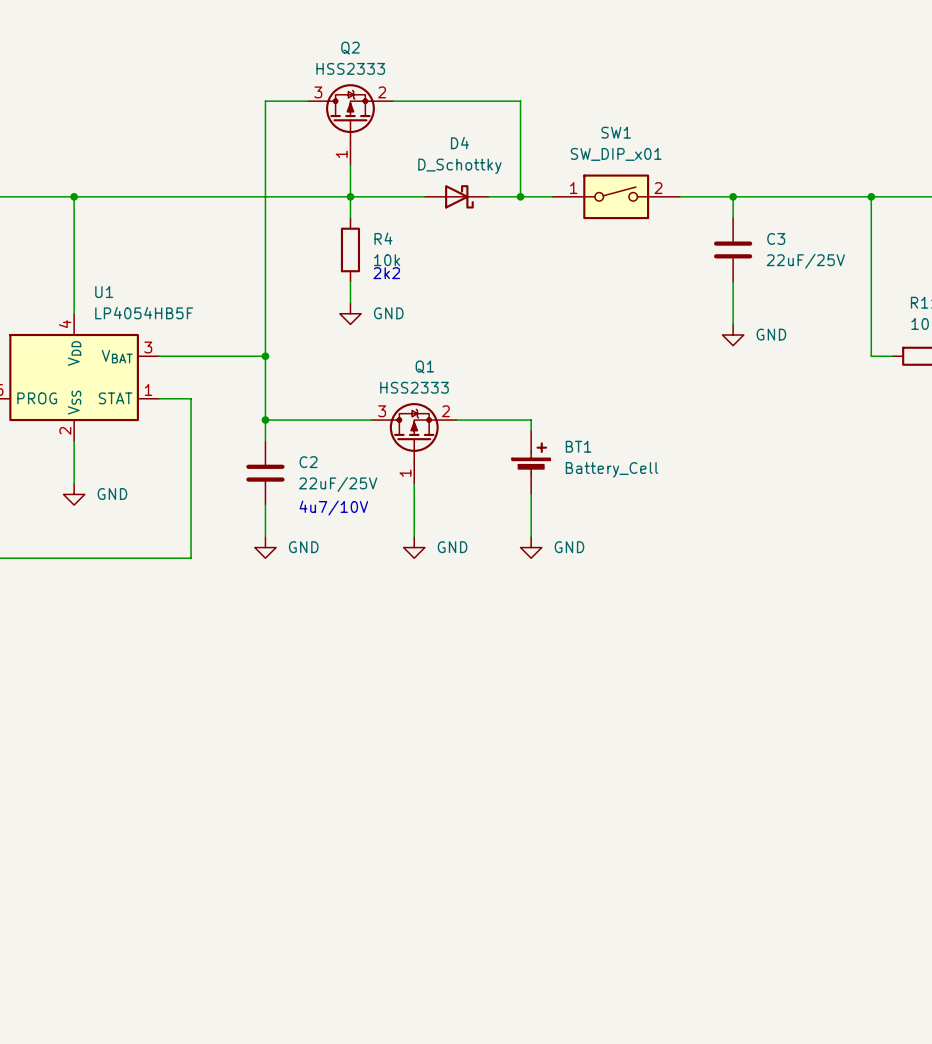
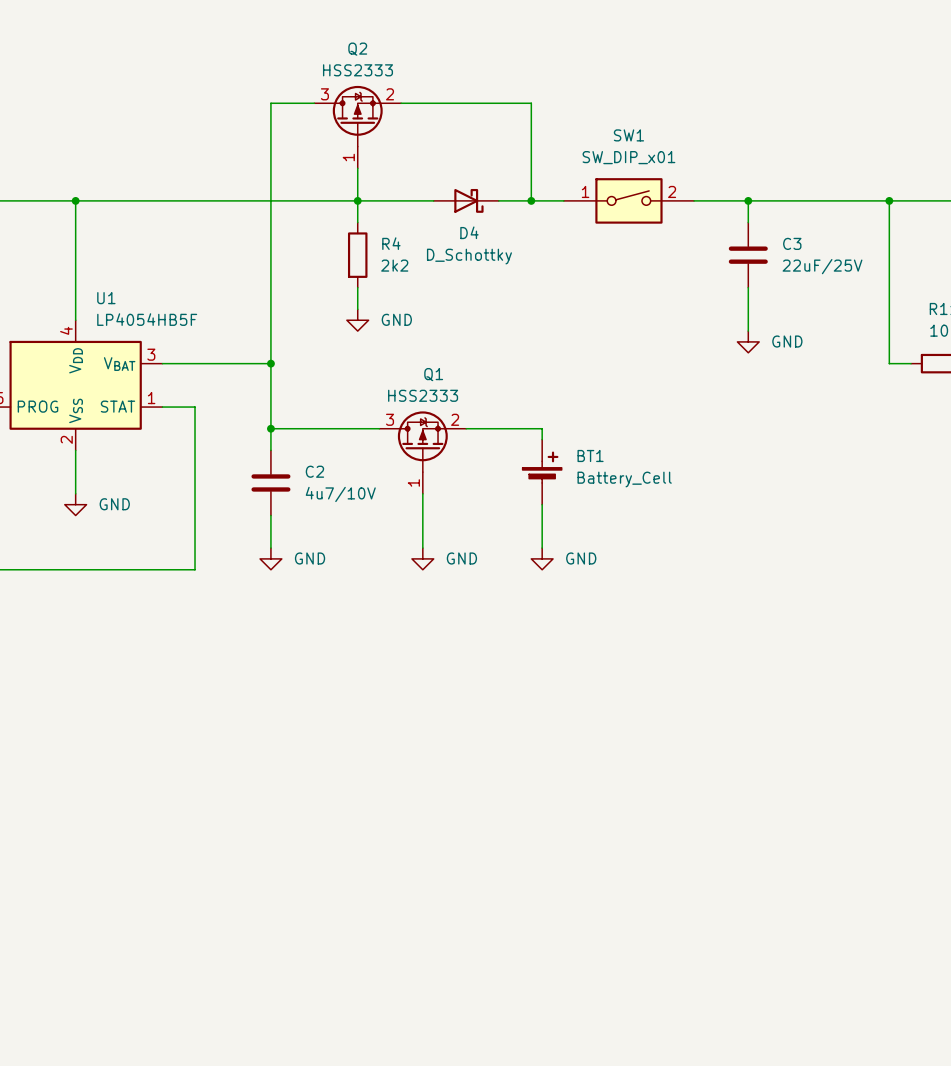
D4 name position: D4 (459, 143) -> D4 (469, 232)
D4 value position: D_Schottky (459, 166) -> D_Schottky (469, 256)
R4 value: 10k (387, 260) -> 2k2 (394, 265)
text: 2k2 (386, 273) -> none
C2 value: 22uF/25V (338, 484) -> 4u7/10V (340, 494)
text: 4u7/10V (333, 507) -> none

